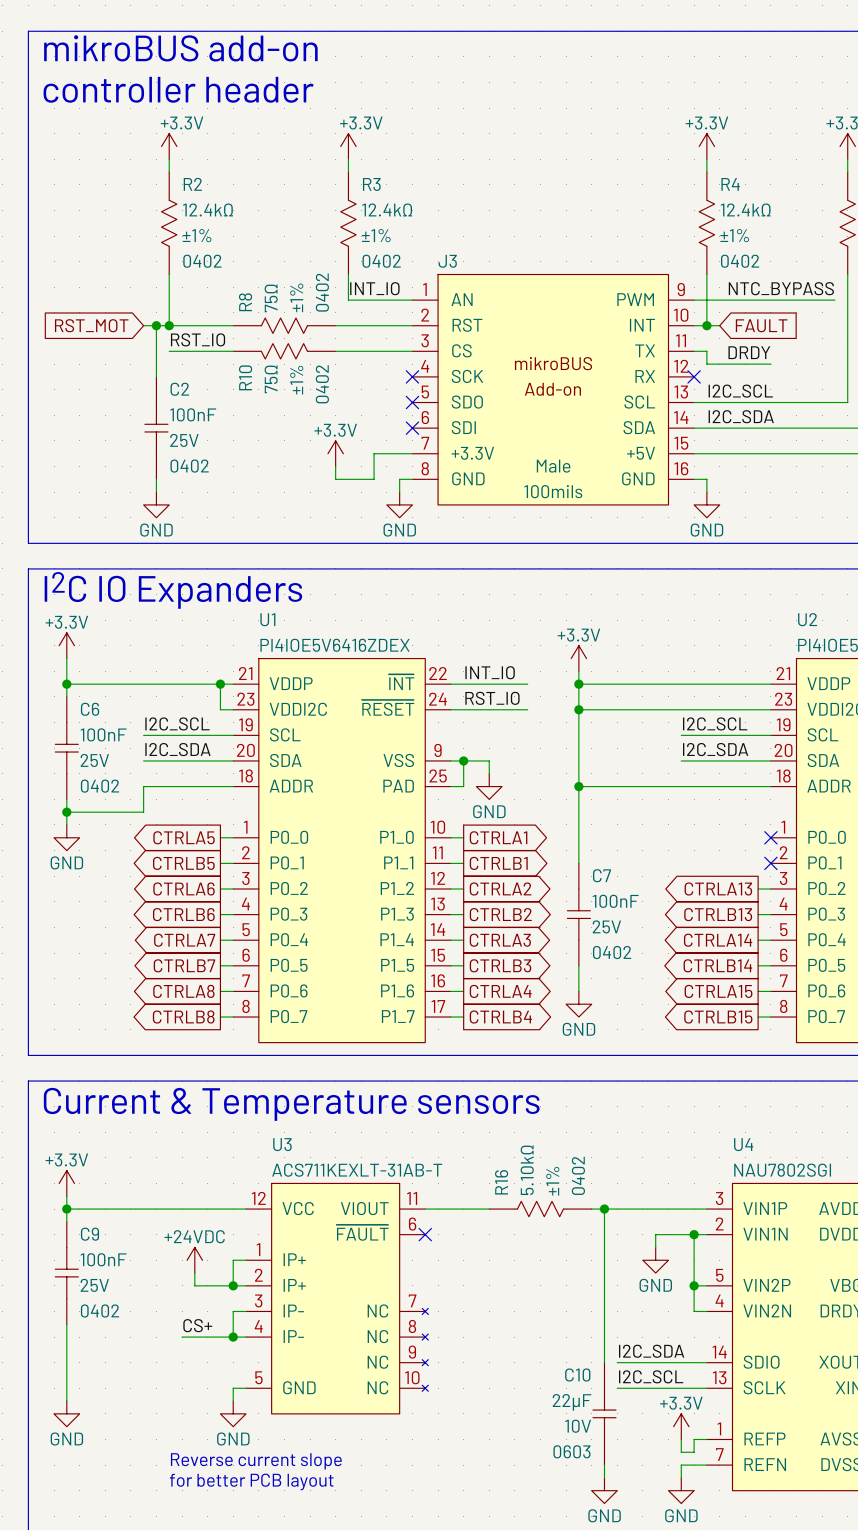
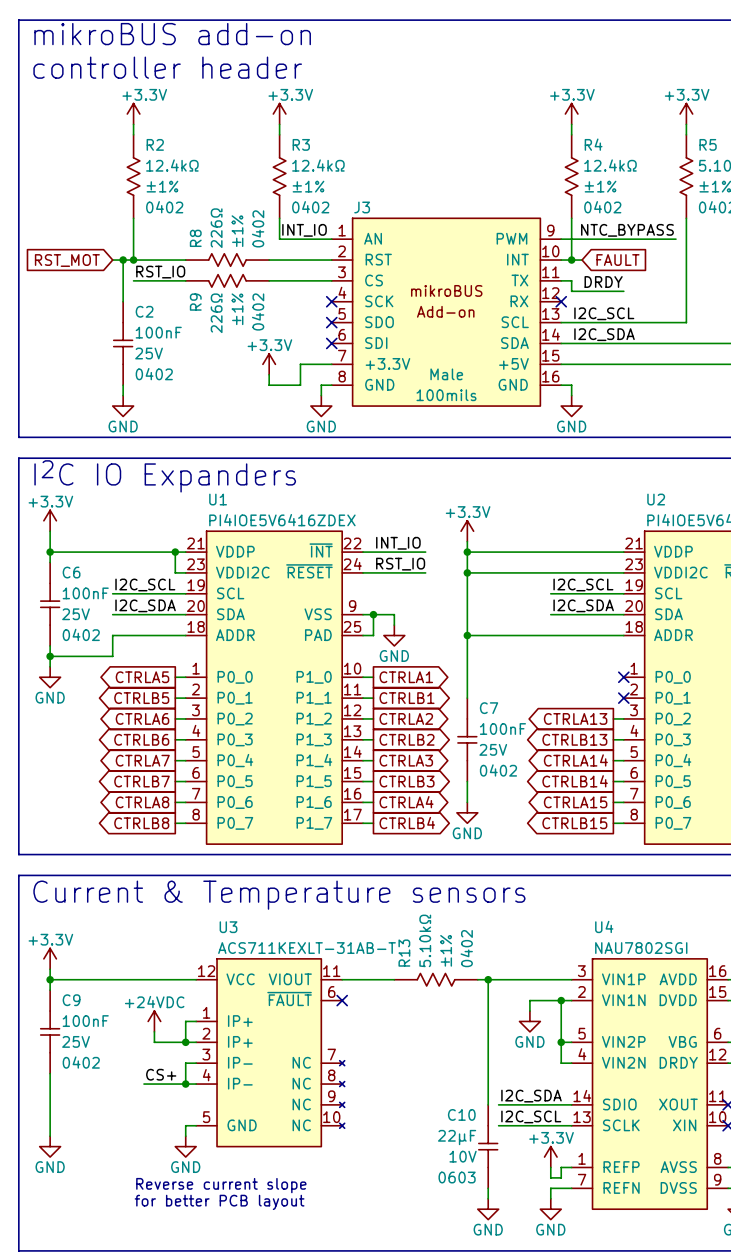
R8 text: 75Ω (271, 298) -> 226Ω (216, 228)
R10 name: R10 (245, 377) -> R9 (195, 302)
R10 text: 75Ω (271, 379) -> 226Ω (216, 313)
R16 name: R16 (501, 1182) -> R13 (404, 953)

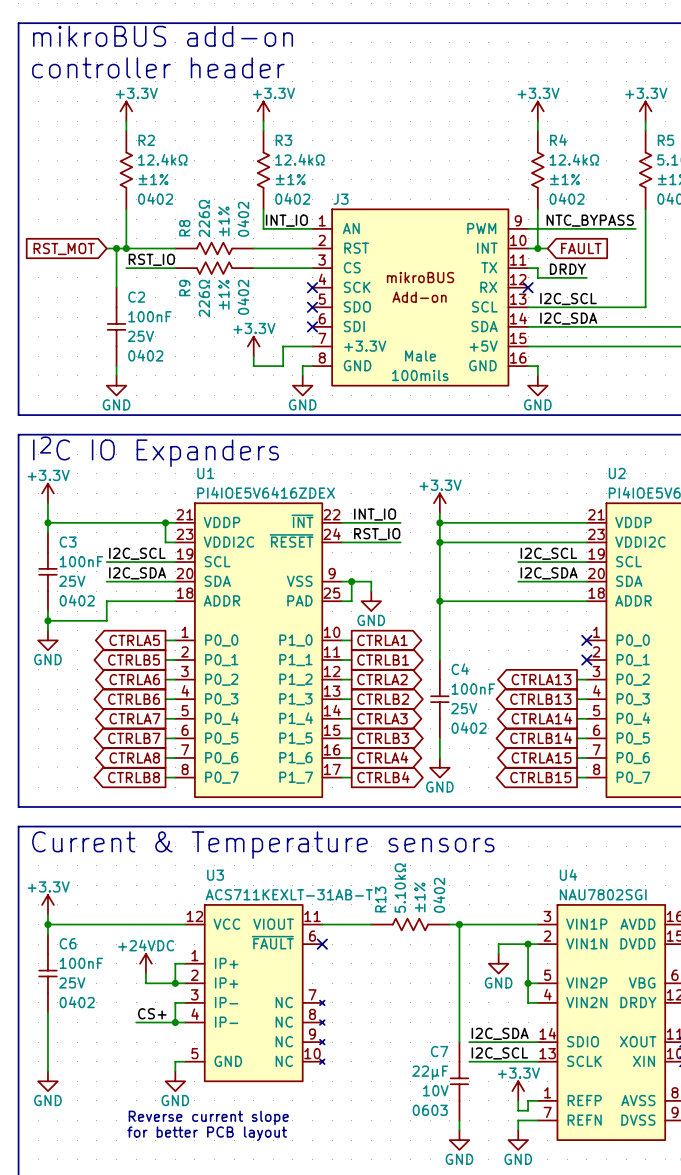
C6 name: C6 (71, 572) -> C3 (68, 542)
C7 name: C7 (489, 708) -> C4 (460, 669)
C9 name: C9 (71, 1000) -> C6 (68, 943)
C10 name: C10 (461, 1114) -> C7 (439, 1051)

